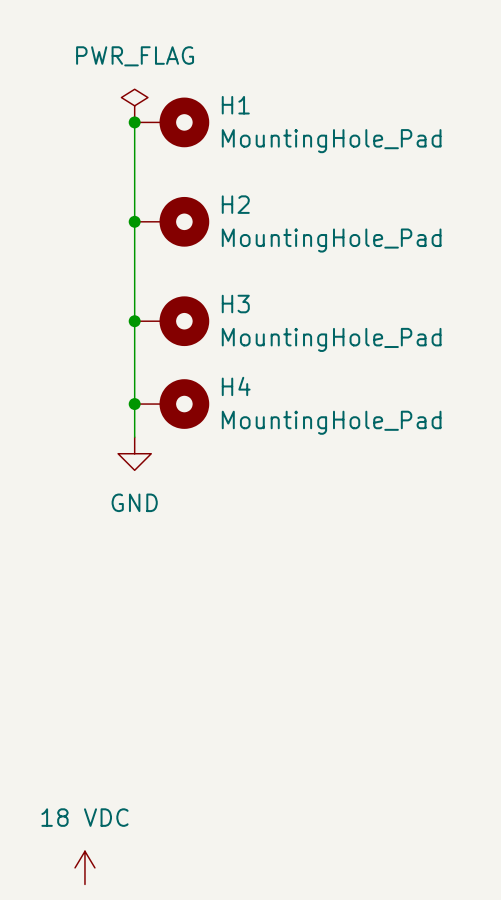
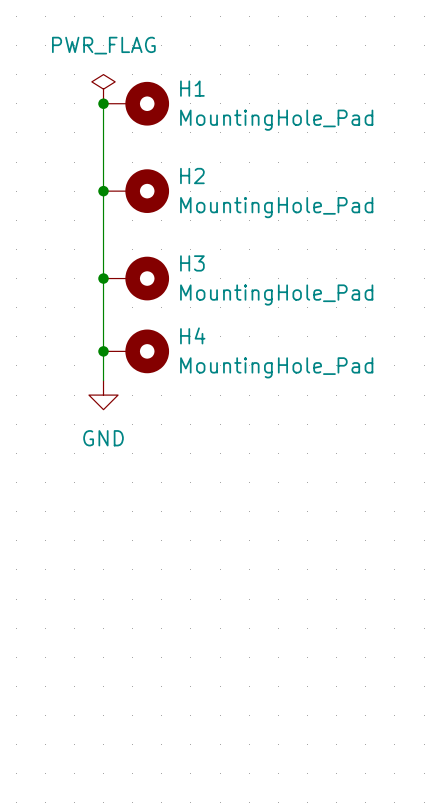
power symbol: 18 VDC (84, 867) -> none

